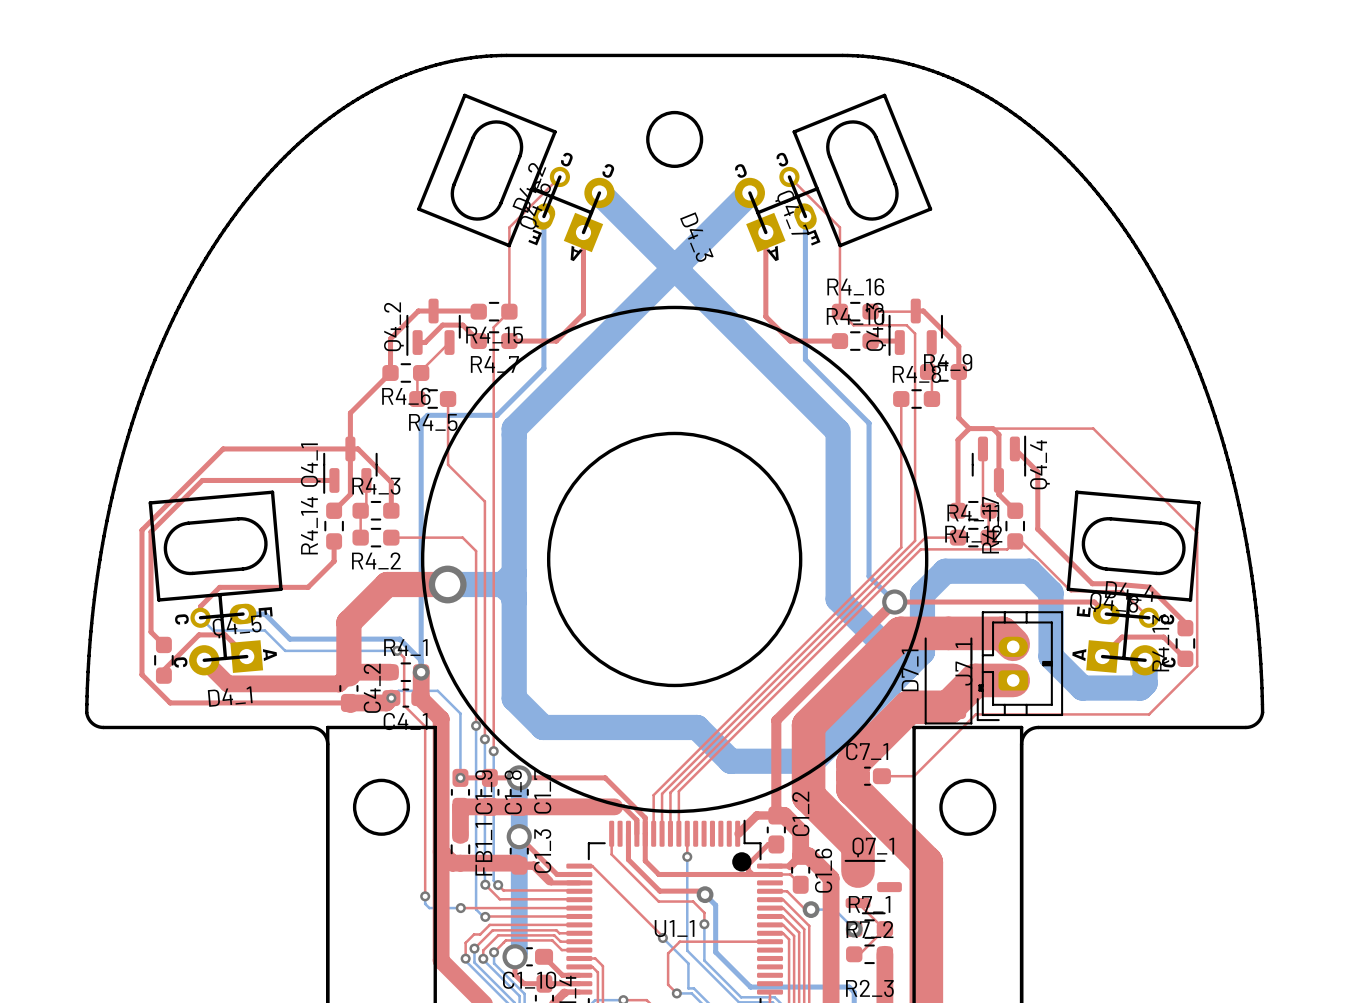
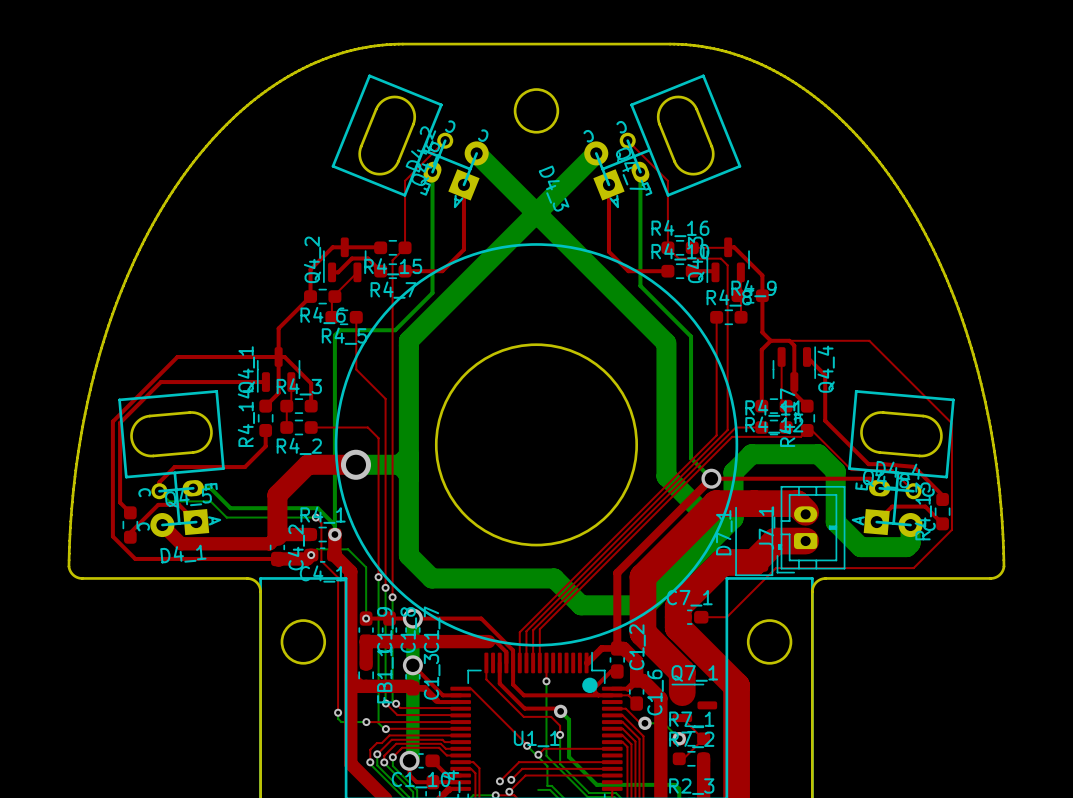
top track: (684, 941) (679, 941) (668, 953) (668, 984) (676, 993) -> (544, 748) (538, 754)
via: none -> (538, 754)
top track: none -> (612, 762) (519, 762) (499, 781)
top track: none -> (612, 768) (522, 768) (511, 779)
top track: none -> (612, 775) (525, 775) (509, 791)
via: none -> (511, 779)
via: none -> (499, 781)
via: (676, 993) -> none
via: none -> (509, 791)

